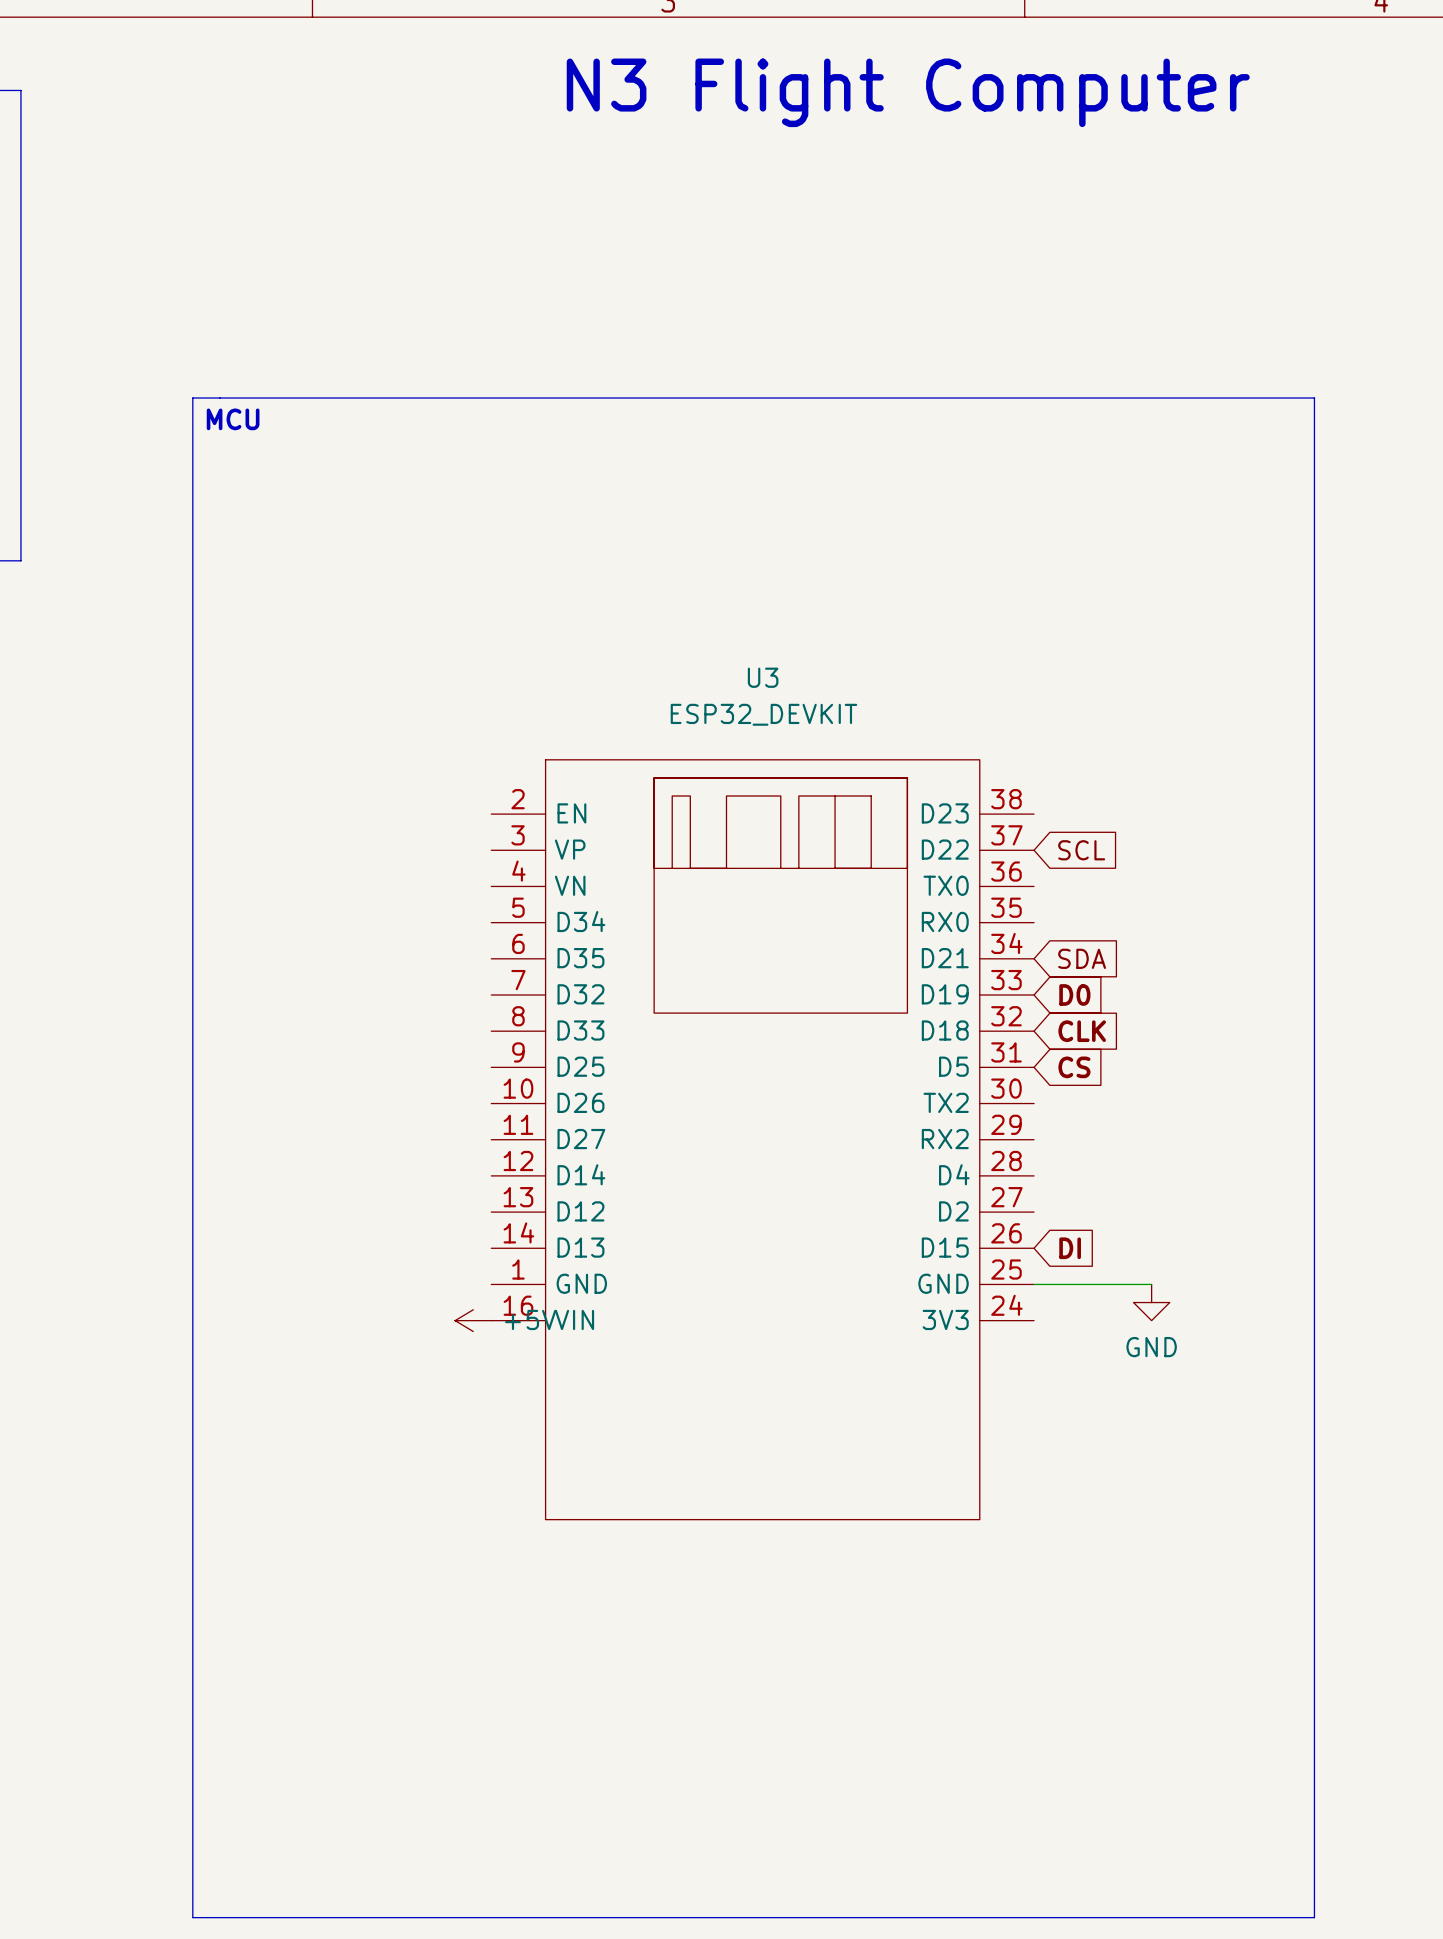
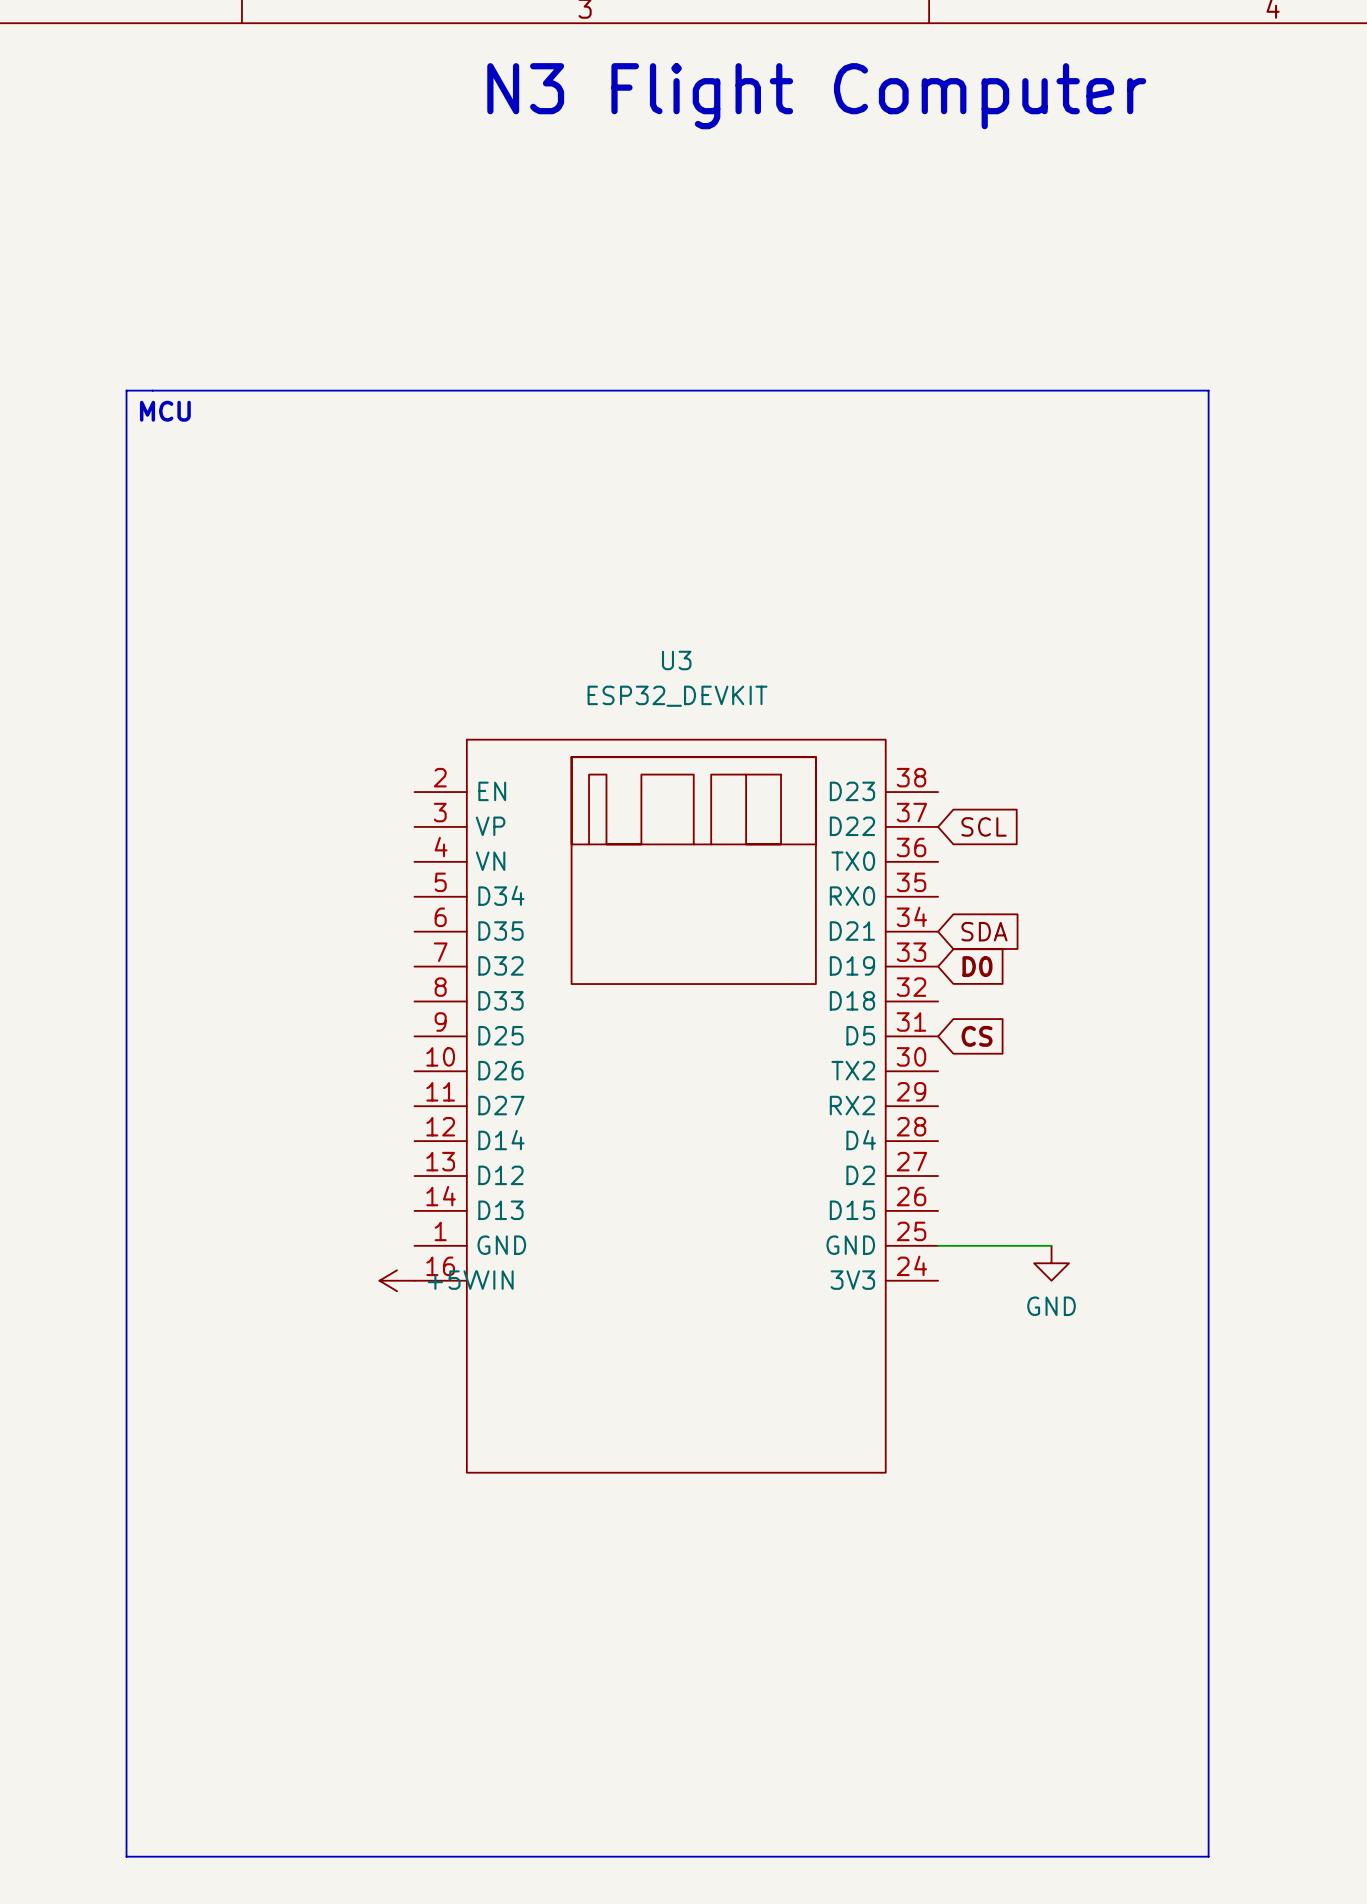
global label: CLK (1082, 1031) -> none
global label: DI (1070, 1248) -> none

